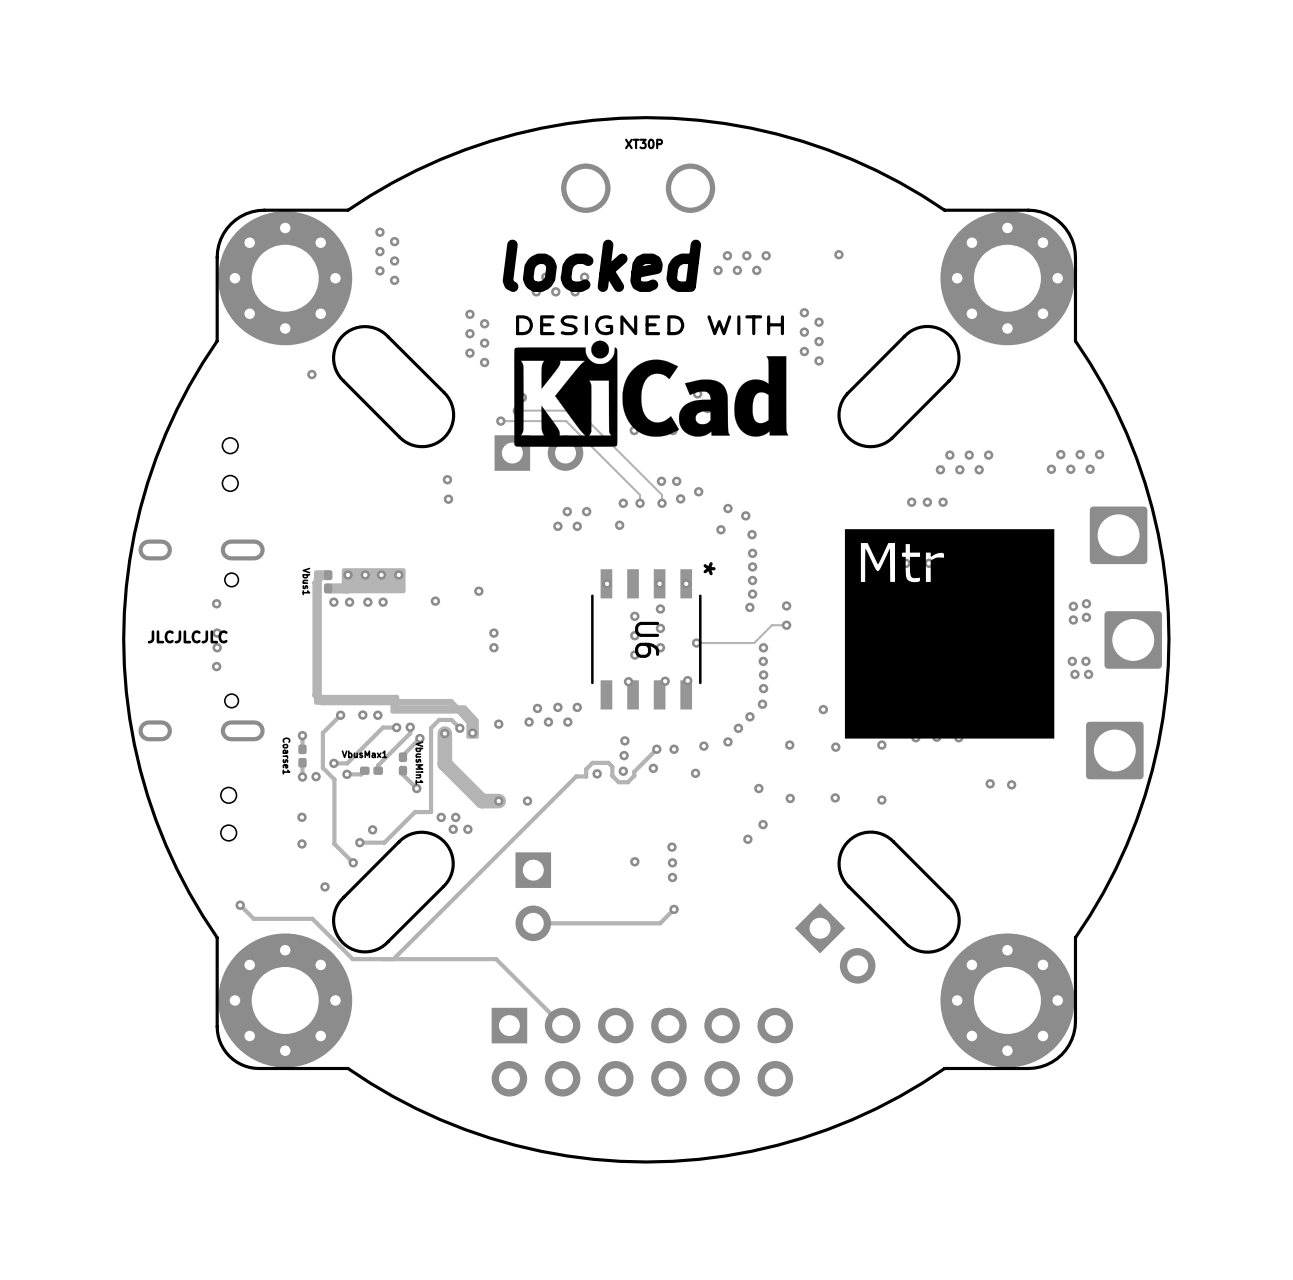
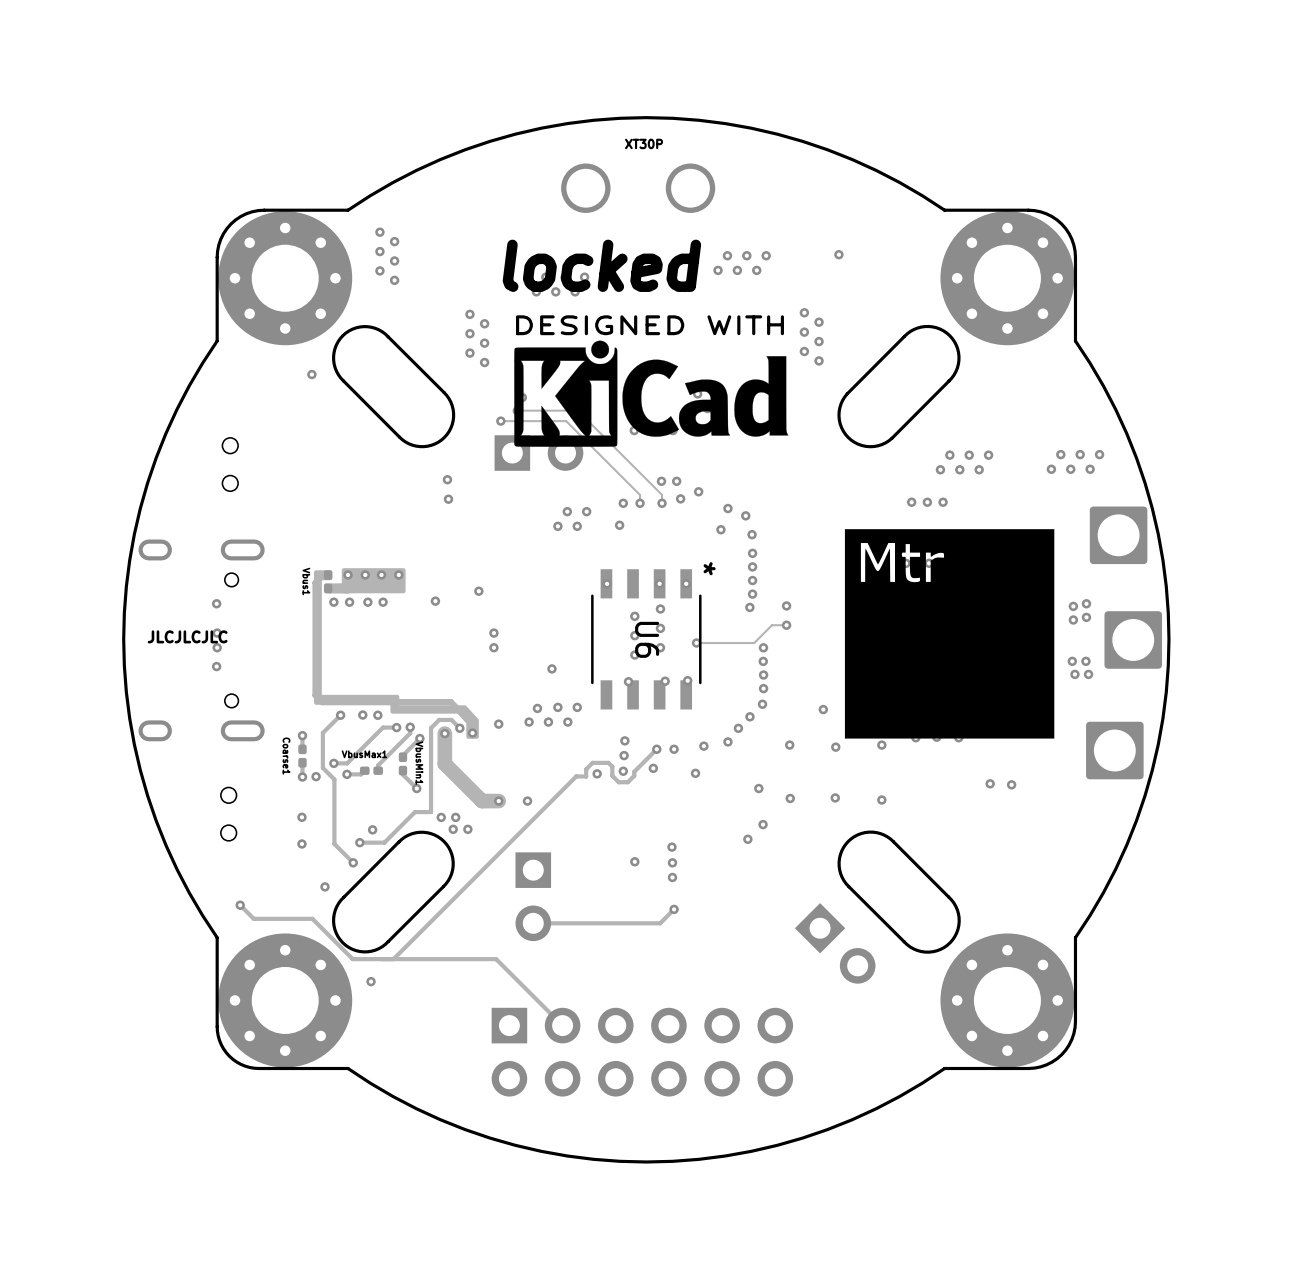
via: none -> (551, 668)
via: none -> (371, 981)

